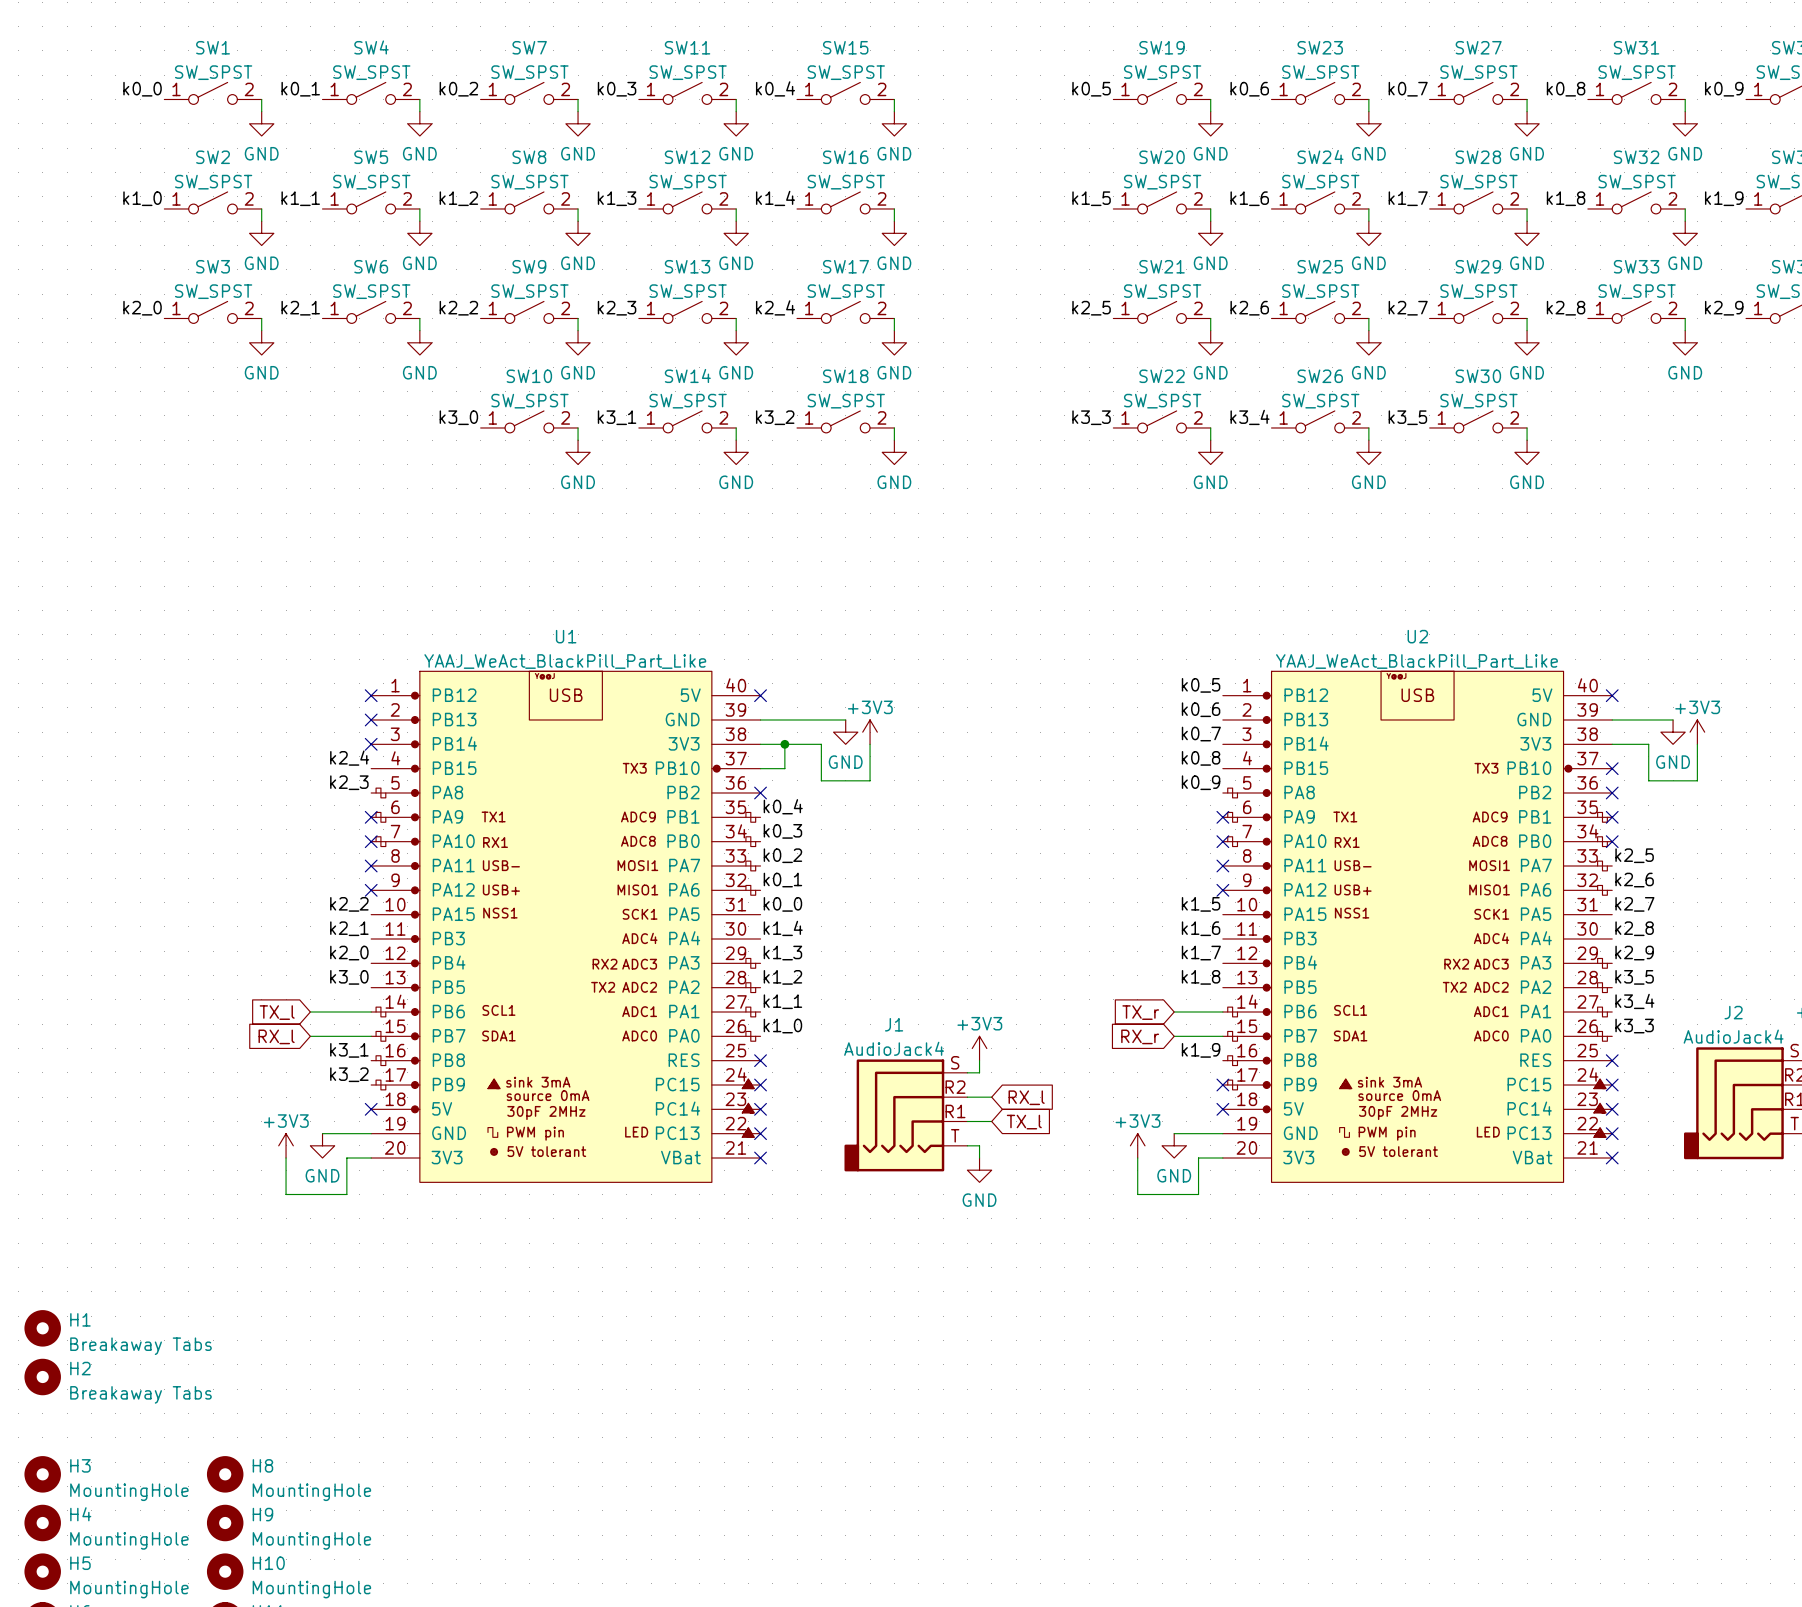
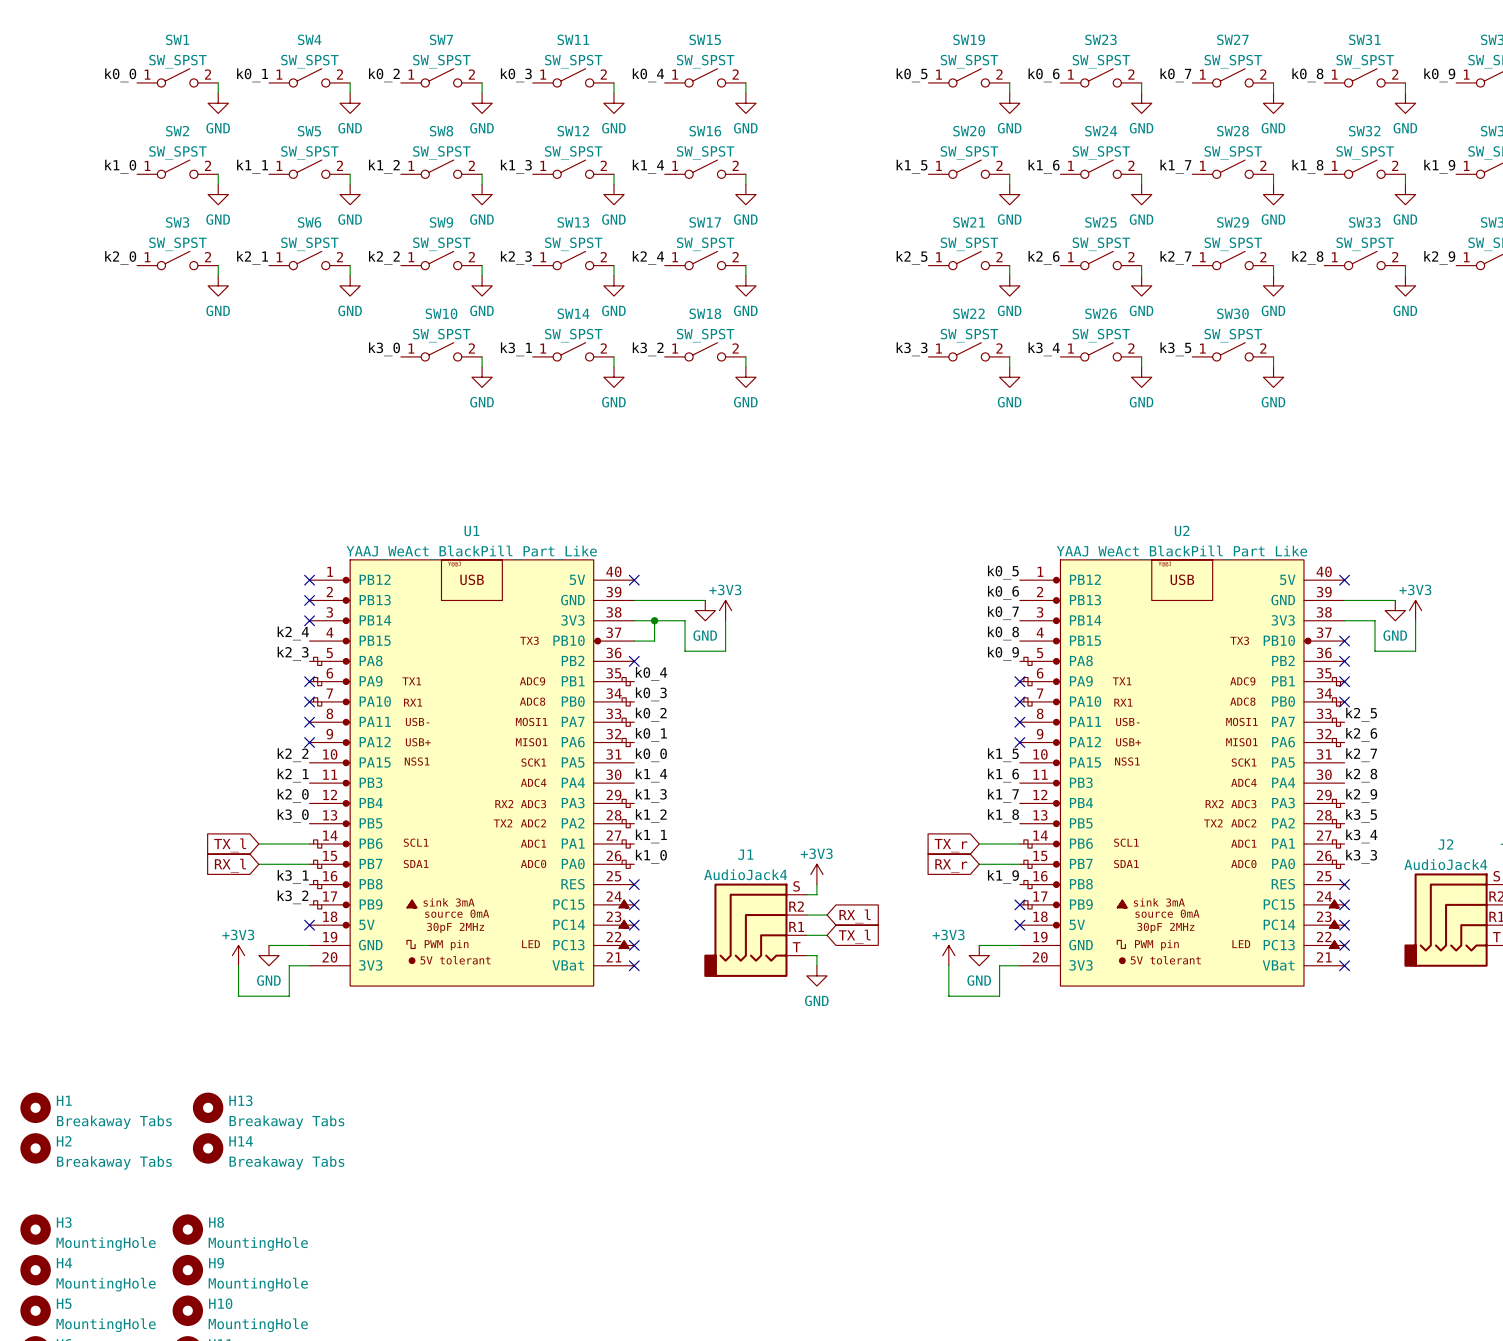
H13: none -> Breakaway Tabs (208, 1107)
H14: none -> Breakaway Tabs (208, 1148)

